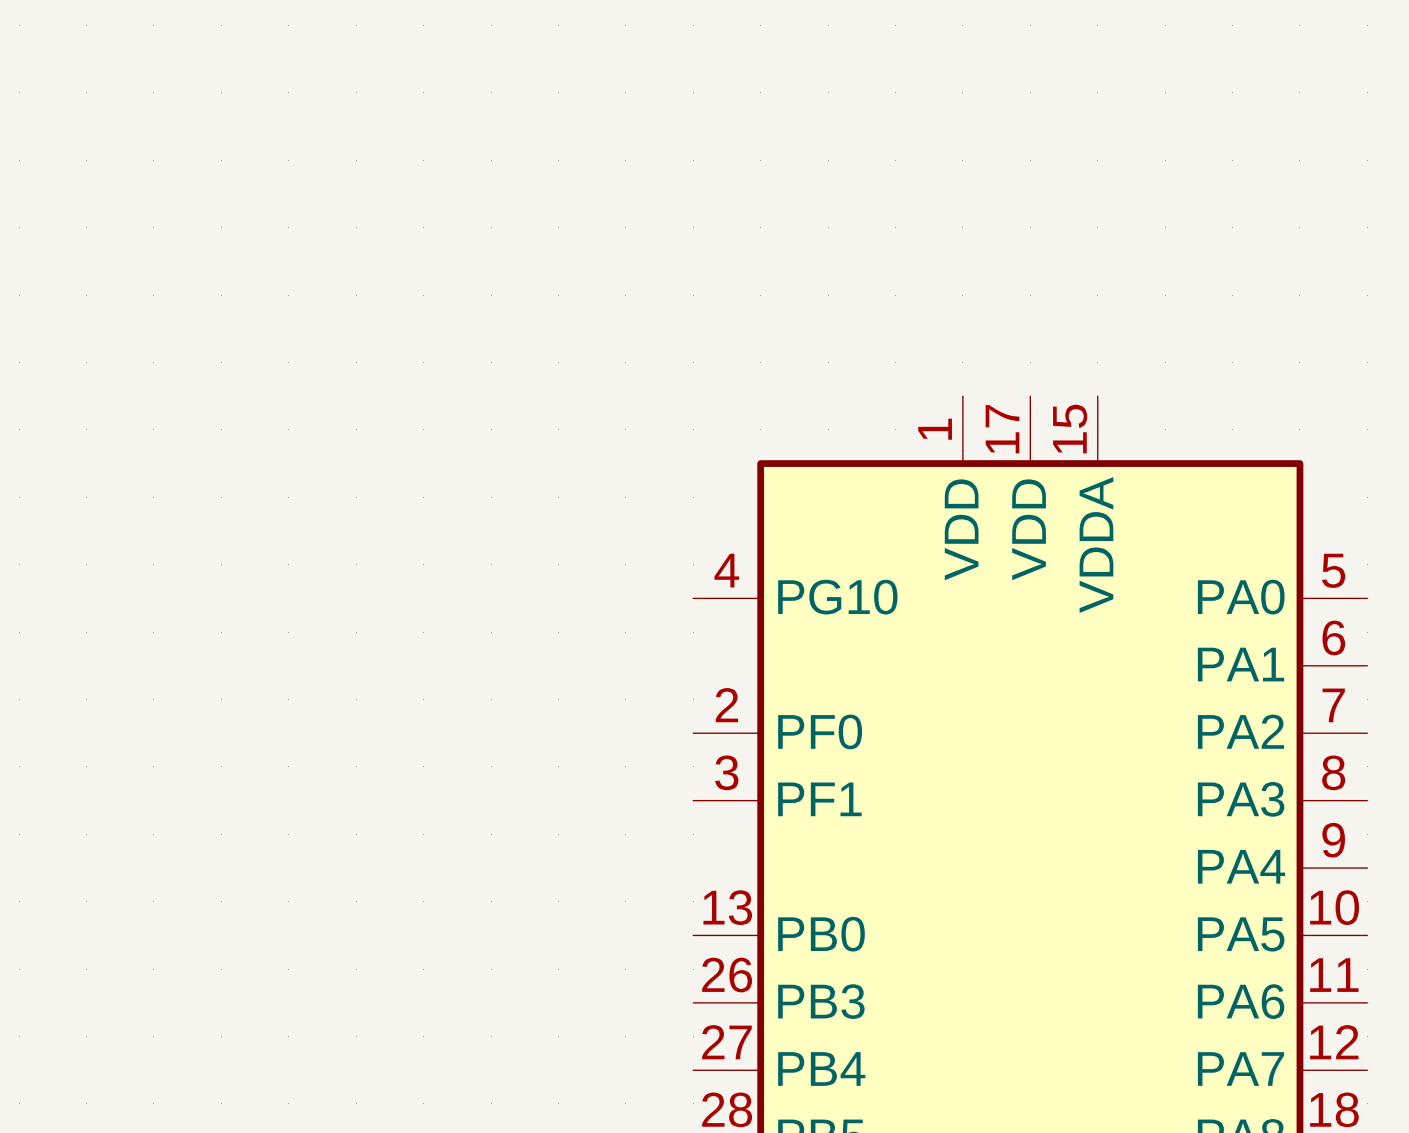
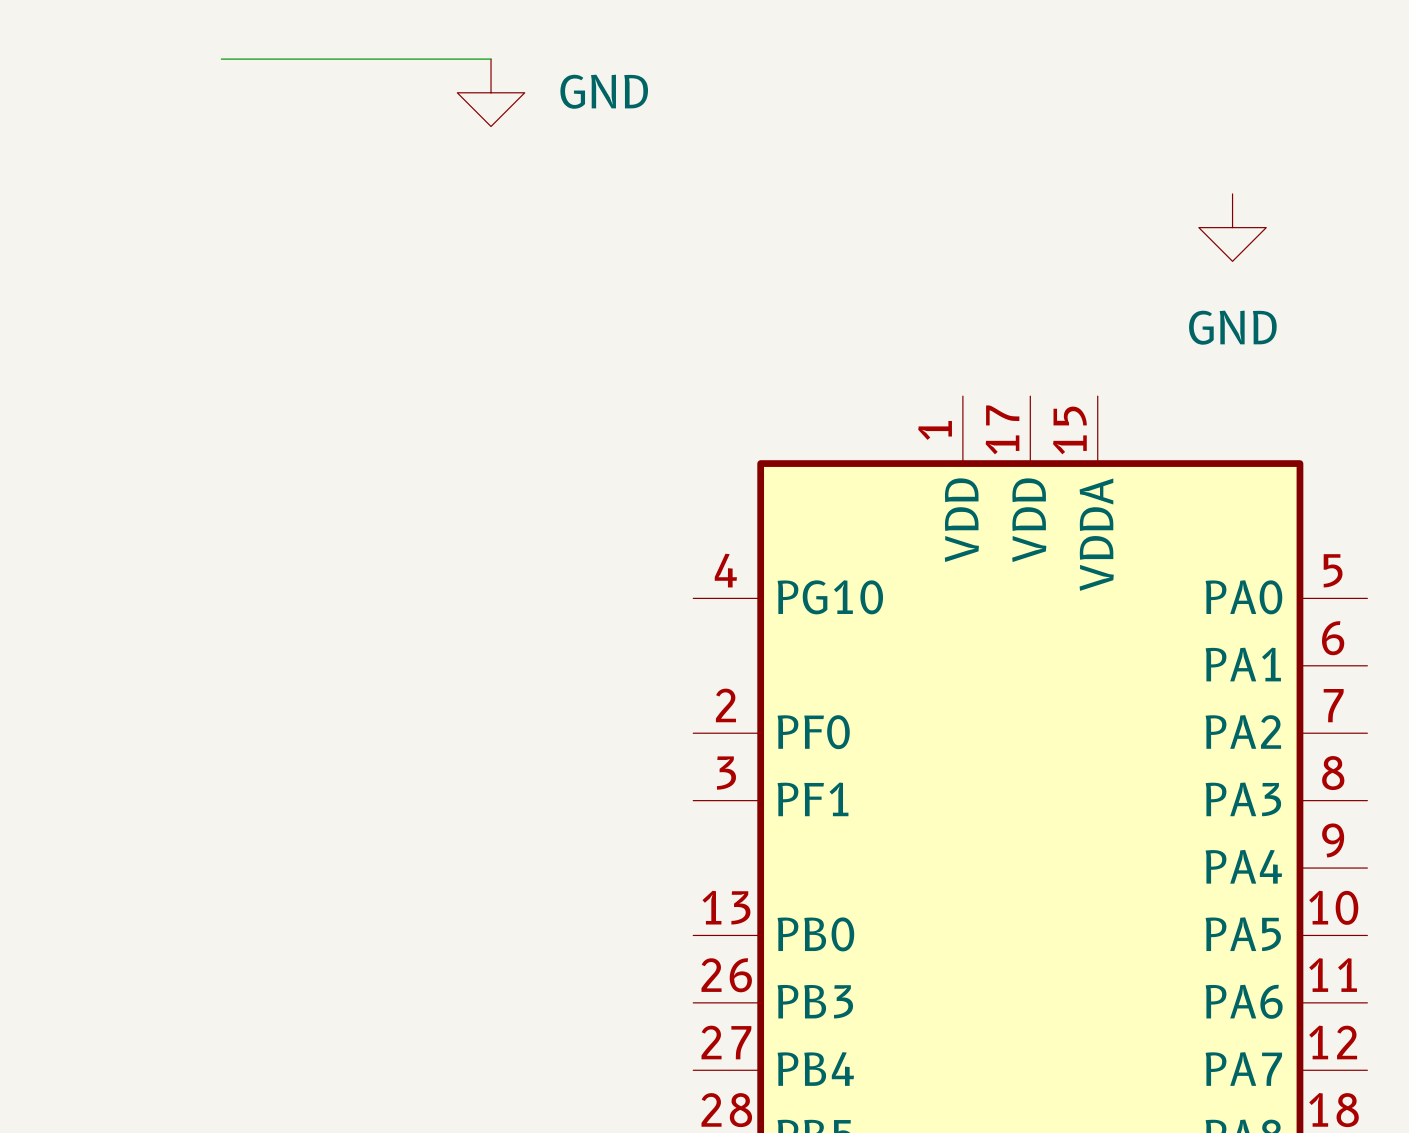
wire: none -> (221, 59) (491, 59)
power symbol: none -> GND (491, 92)
power symbol: none -> GND (1232, 227)

